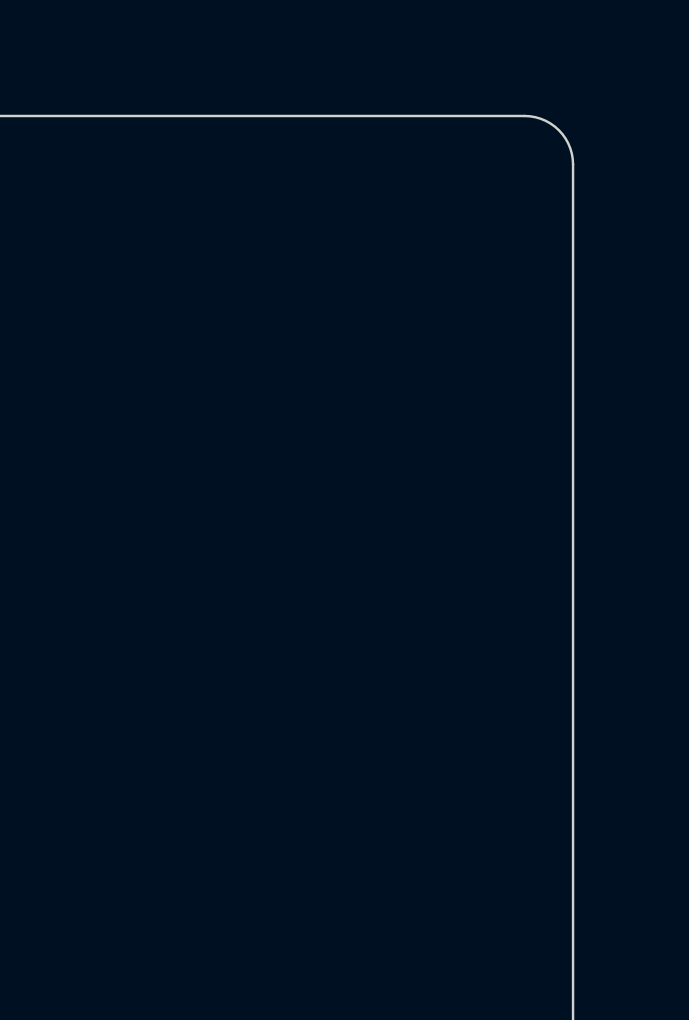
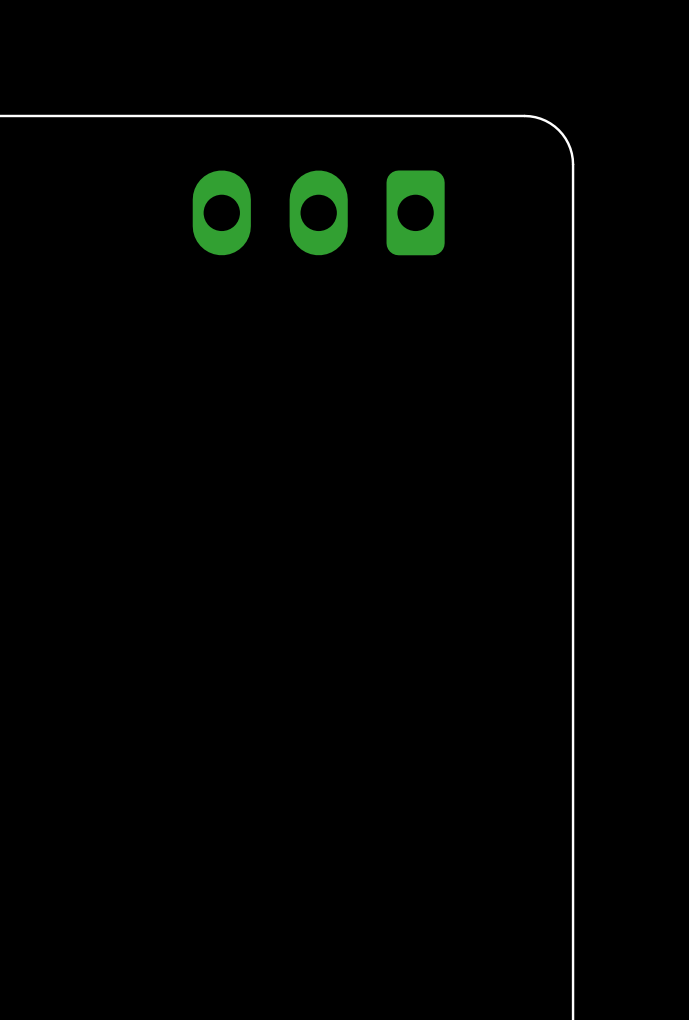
part: none -> (318, 212)

